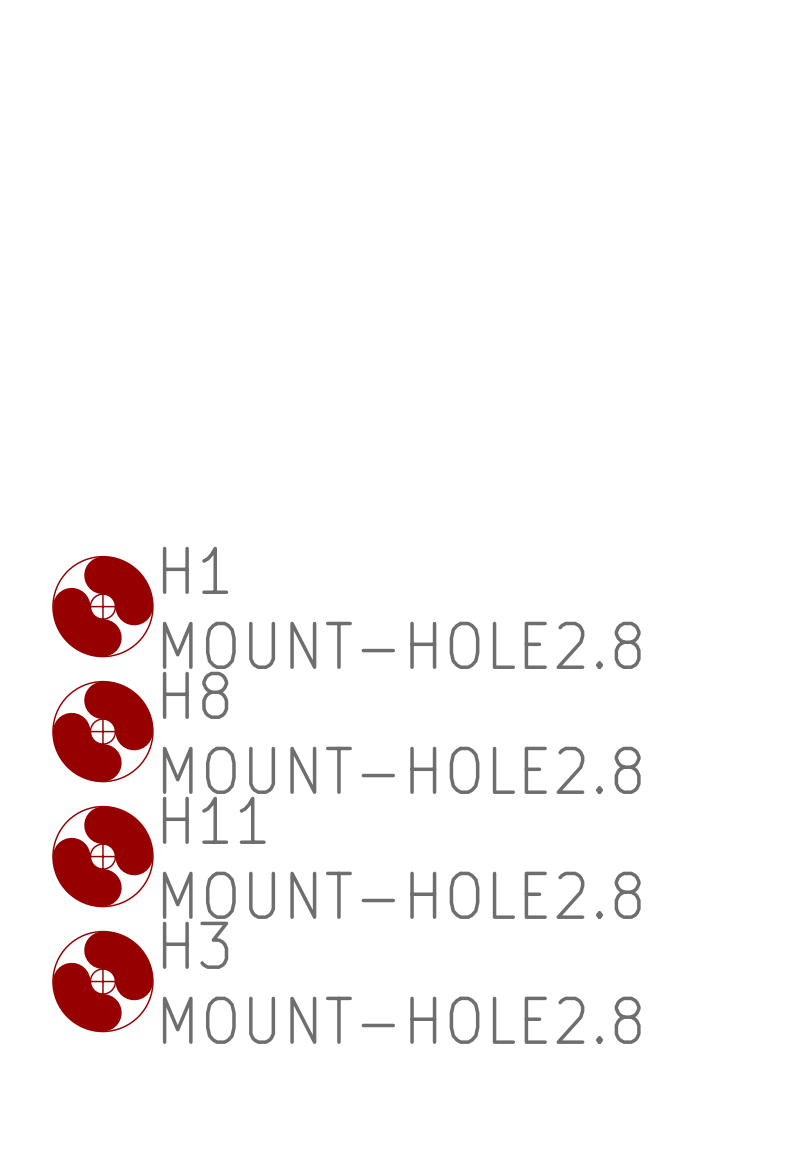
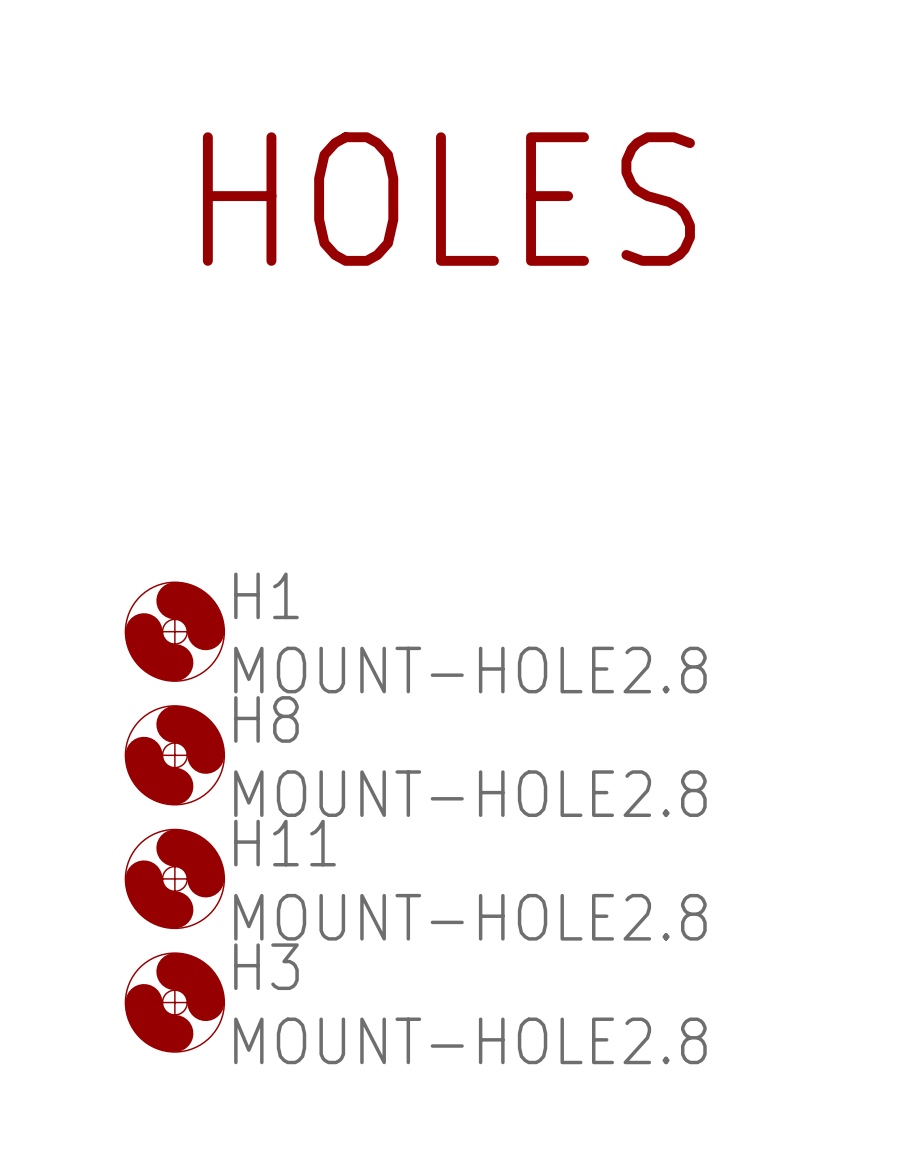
text: none -> HOLES (448, 199)

